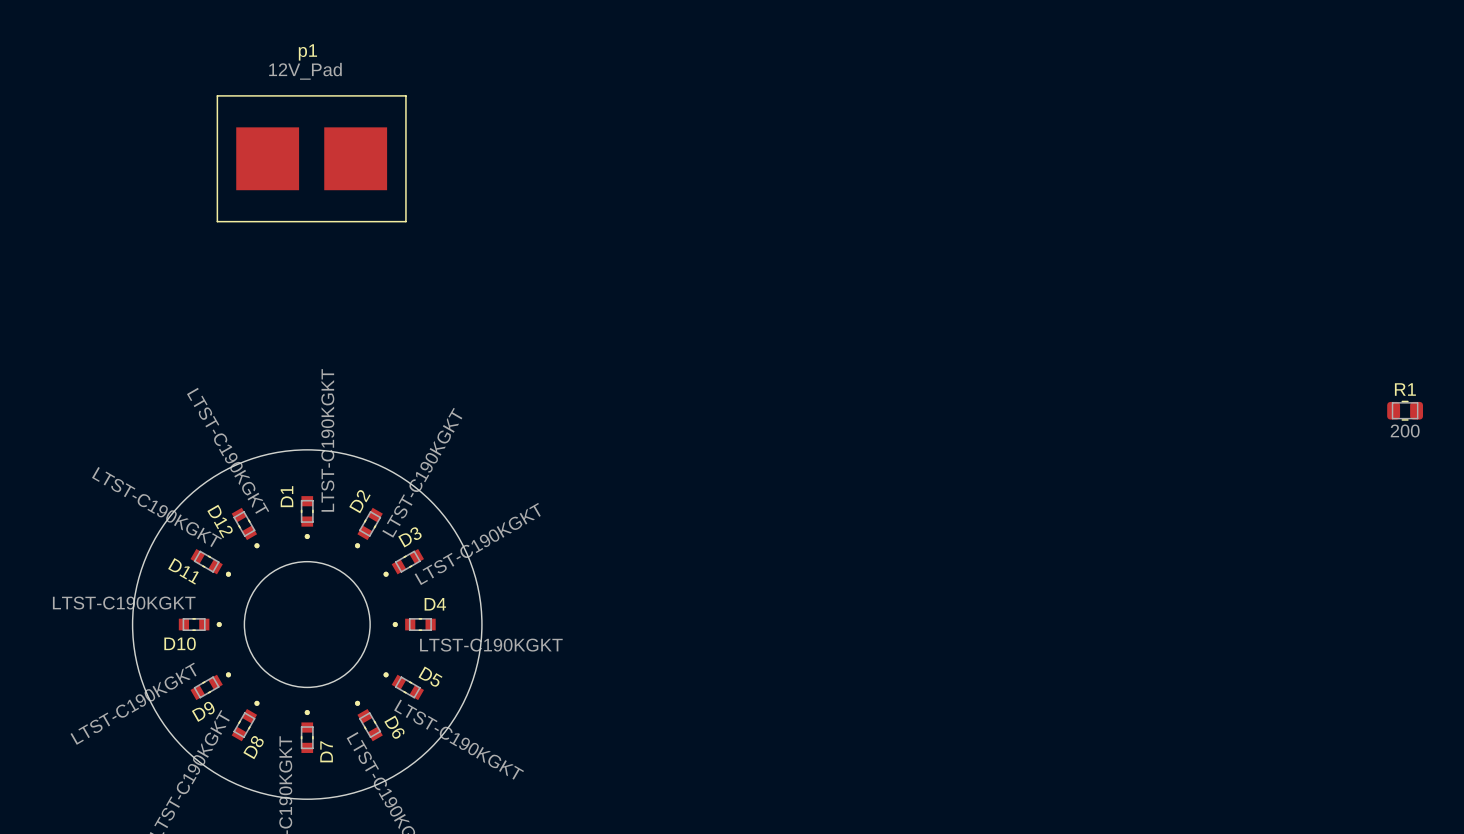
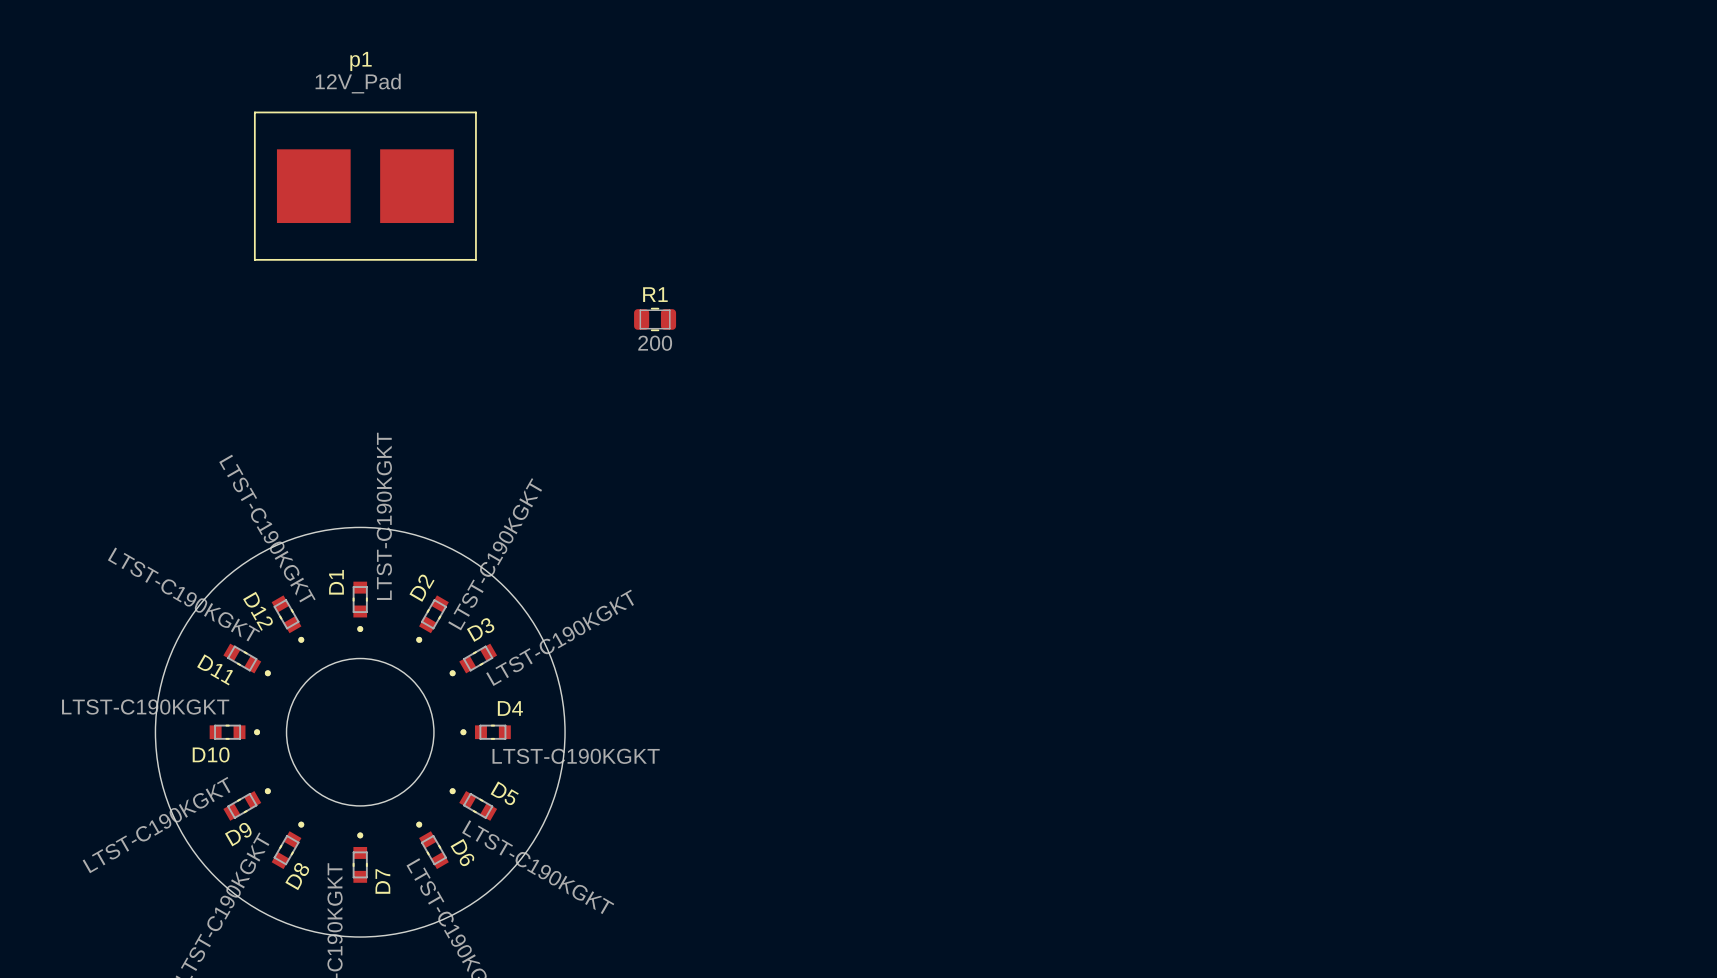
R1 position: (1405, 410) -> (655, 319)

